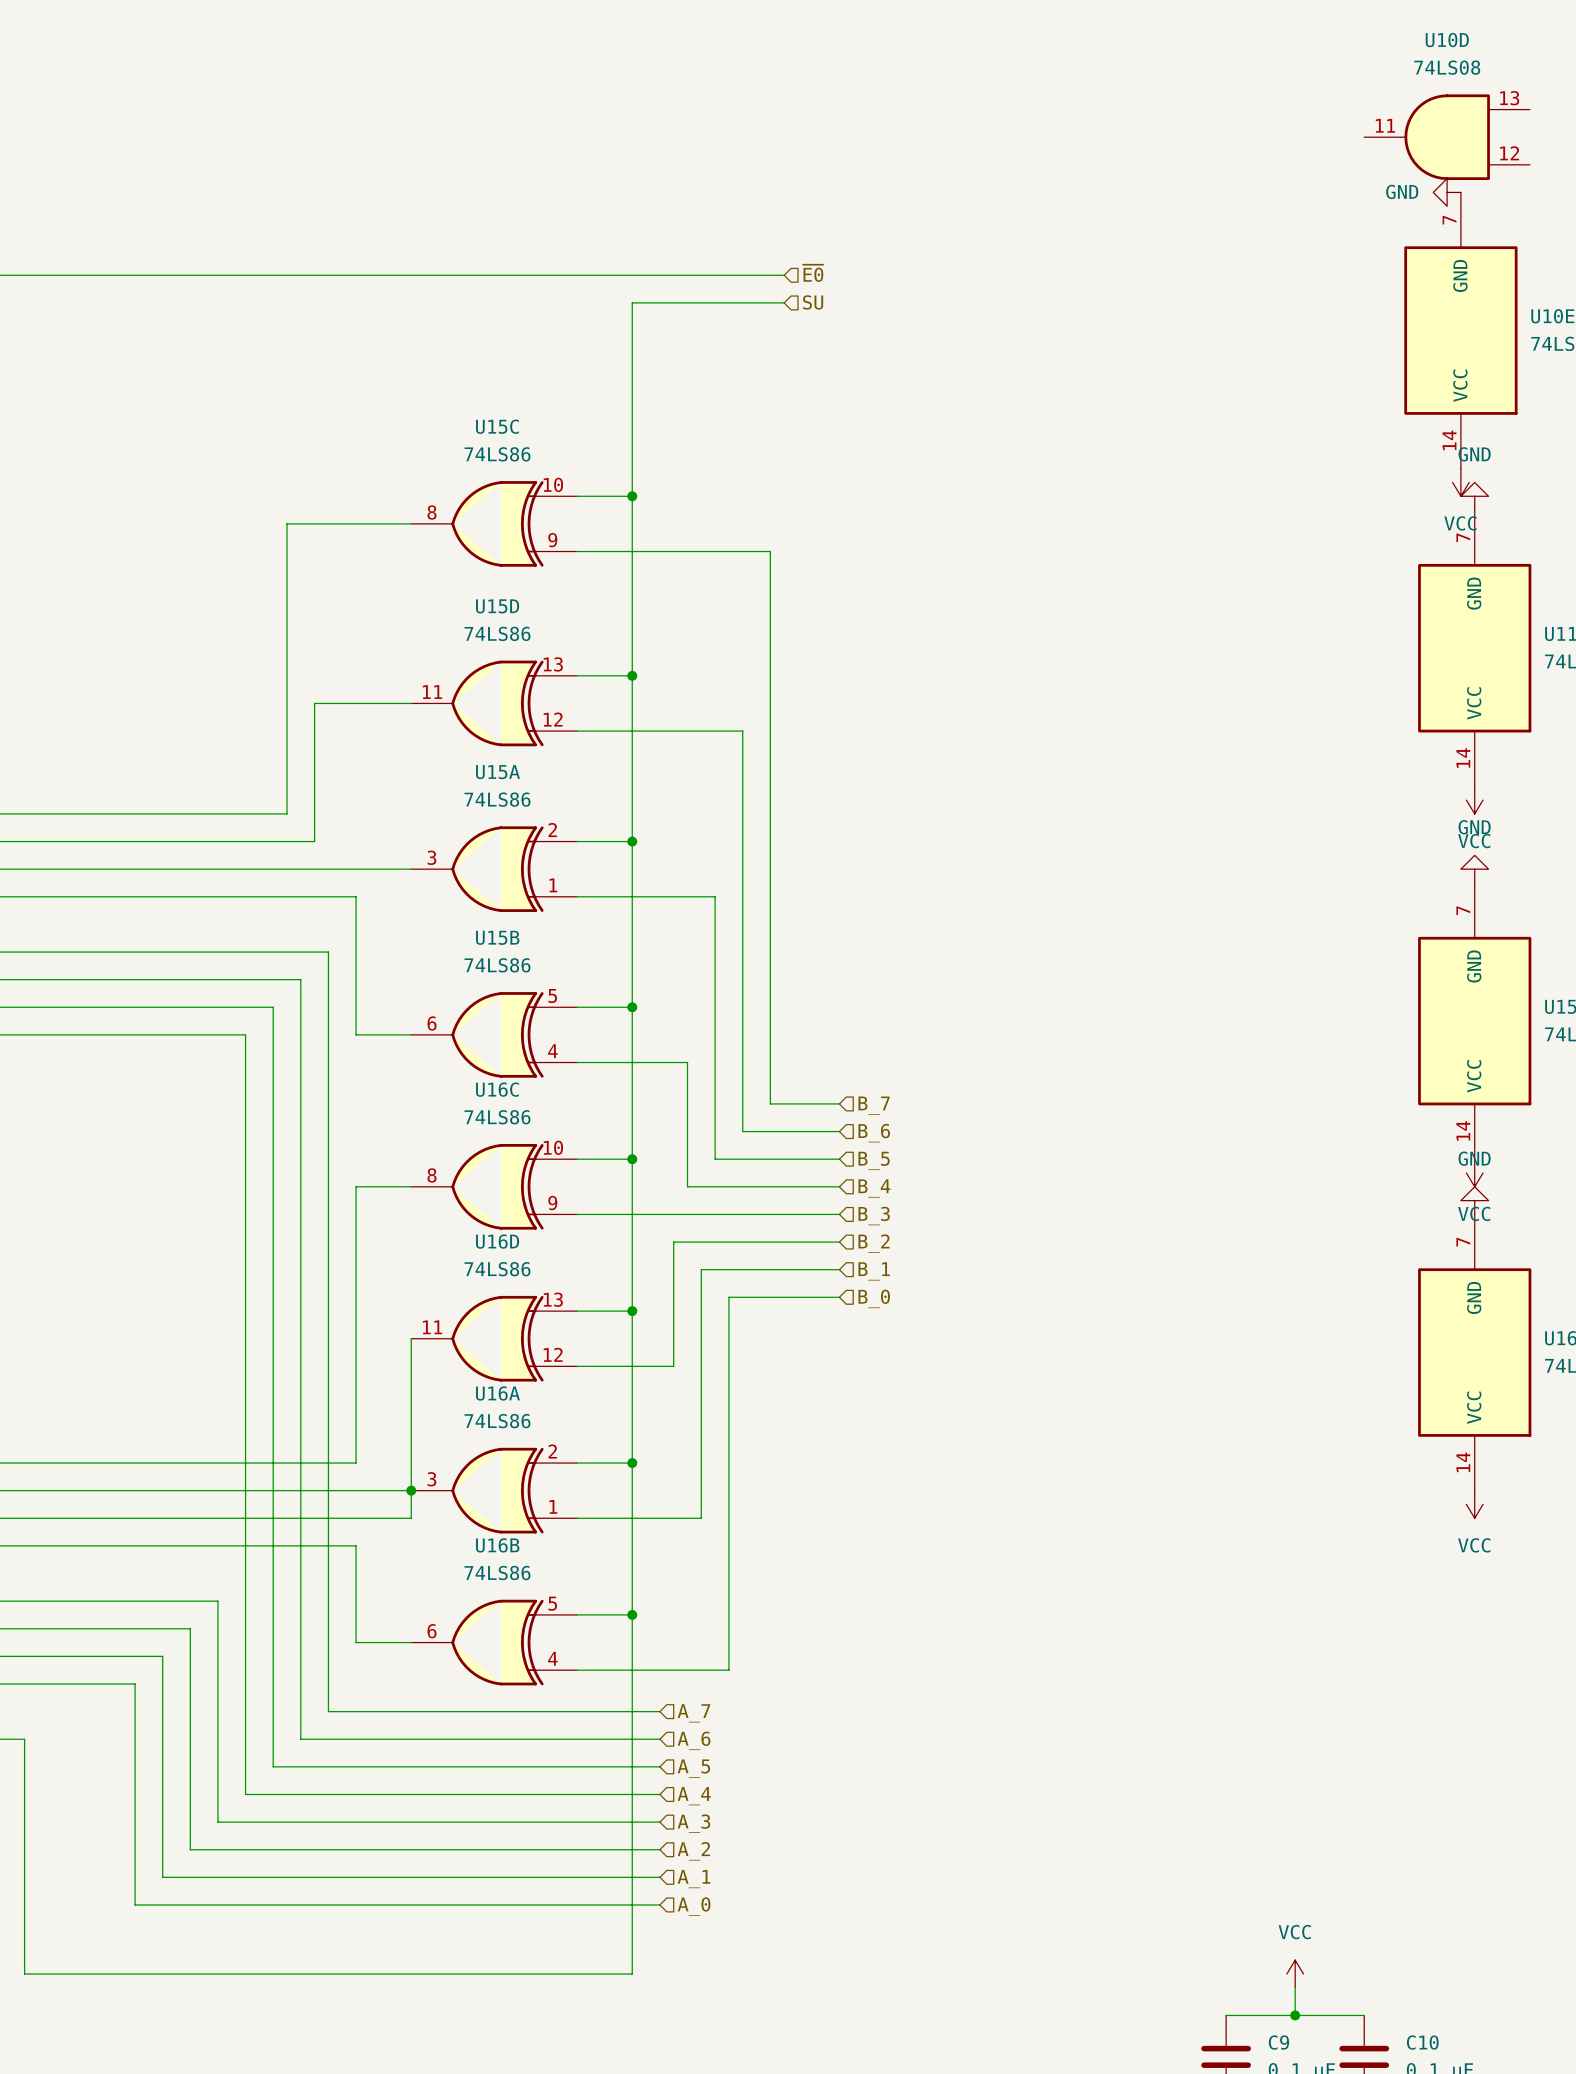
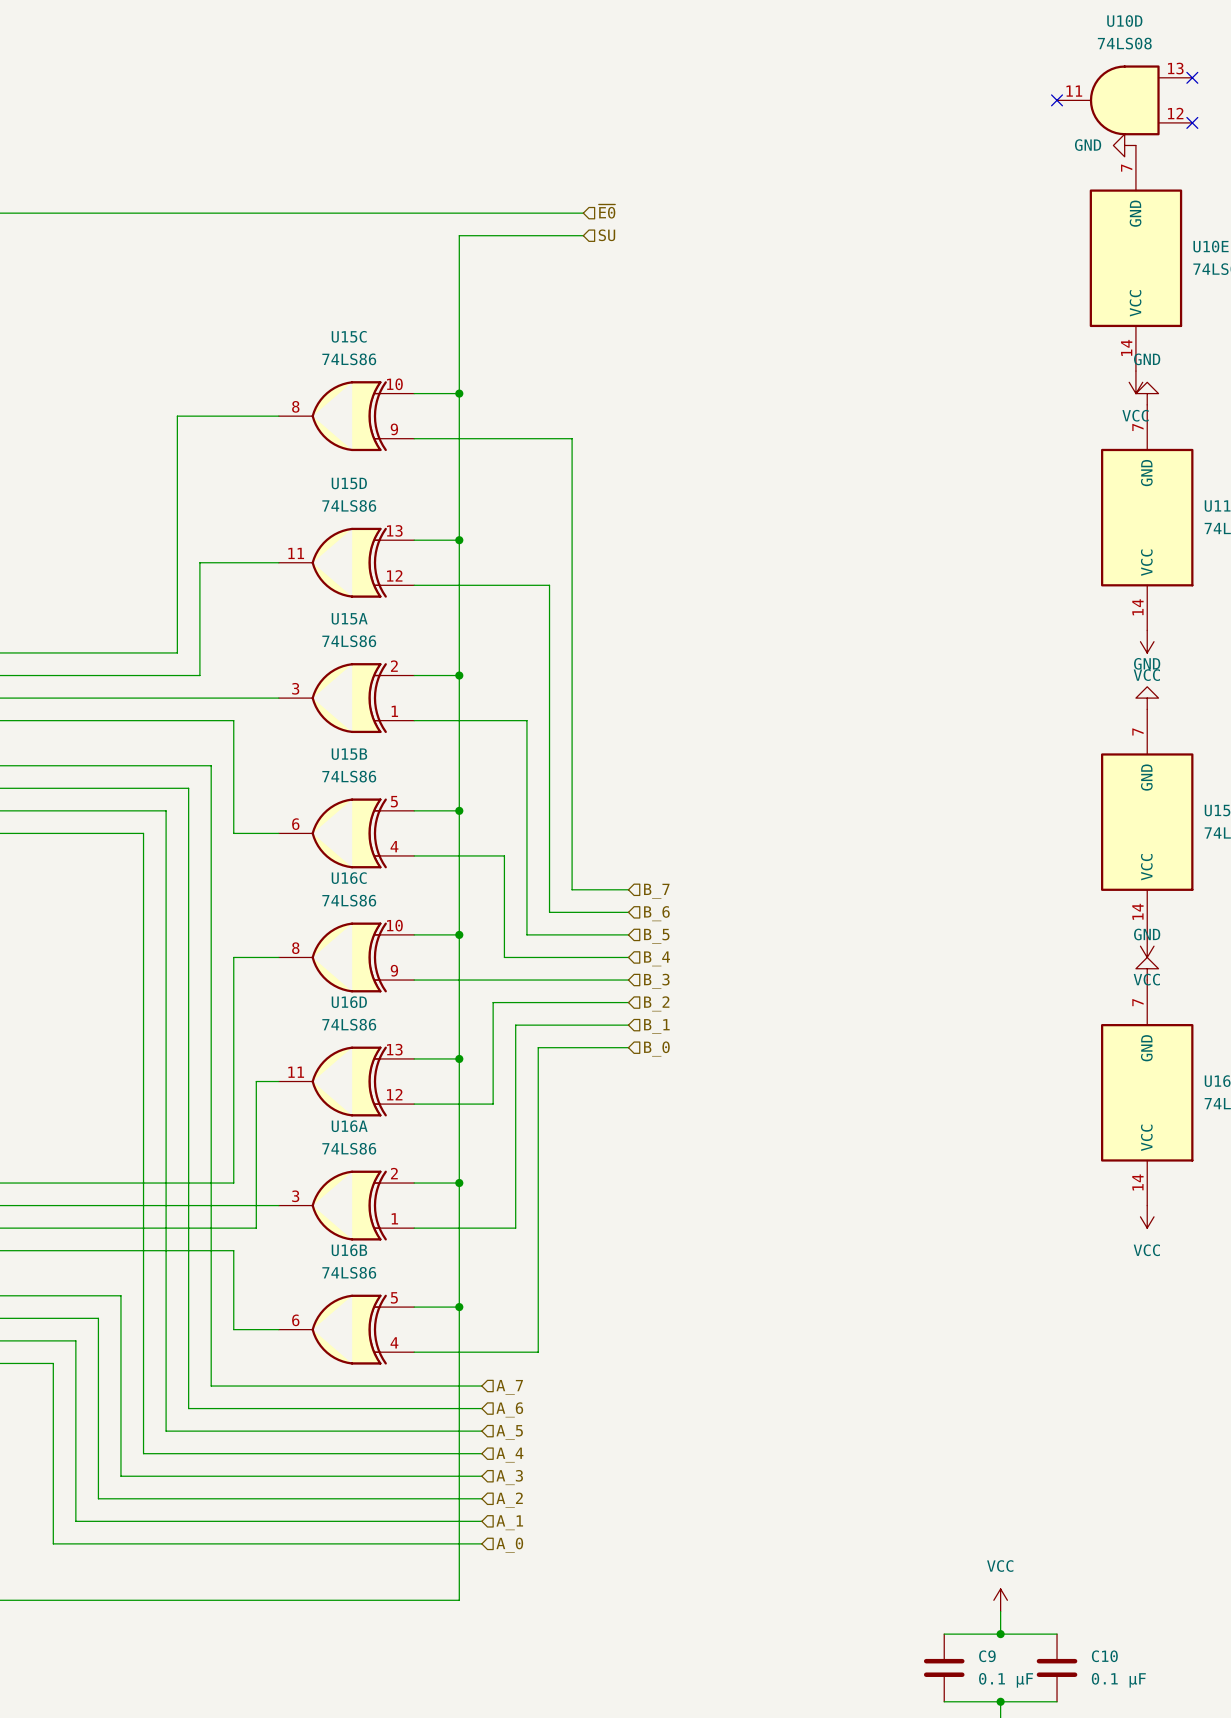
no-connect mark: none -> (1192, 77)
no-connect mark: none -> (1057, 100)
no-connect mark: none -> (1192, 122)
wire: (411, 1338) (411, 1518) (383, 1518) -> (278, 1081) (256, 1081) (256, 1228)
junction: (411, 1490) -> none

